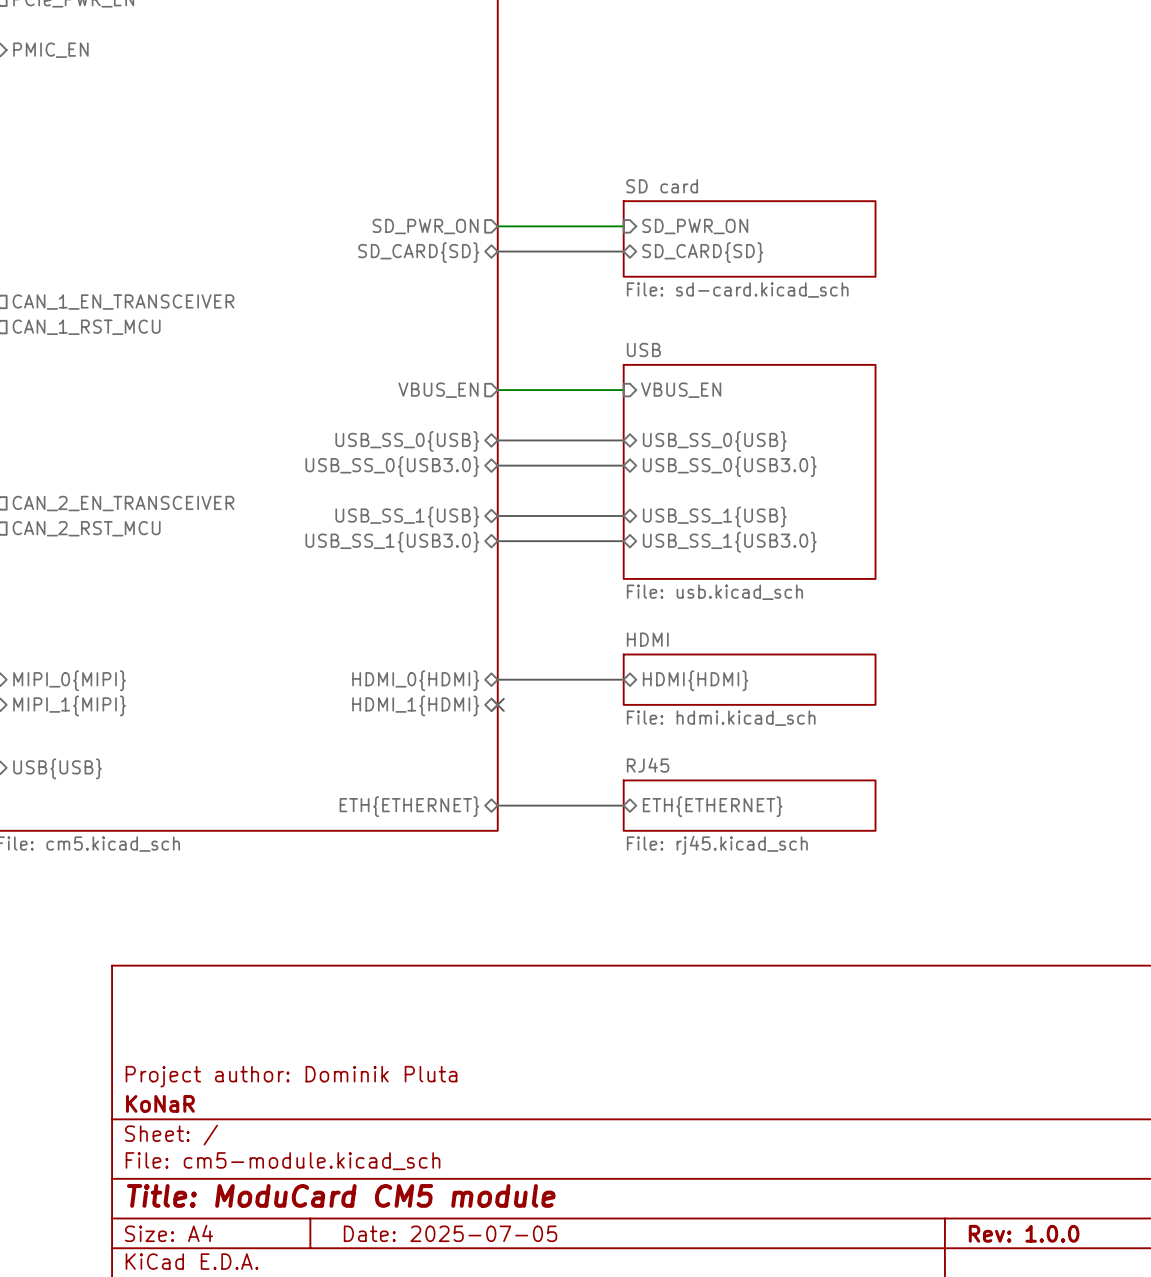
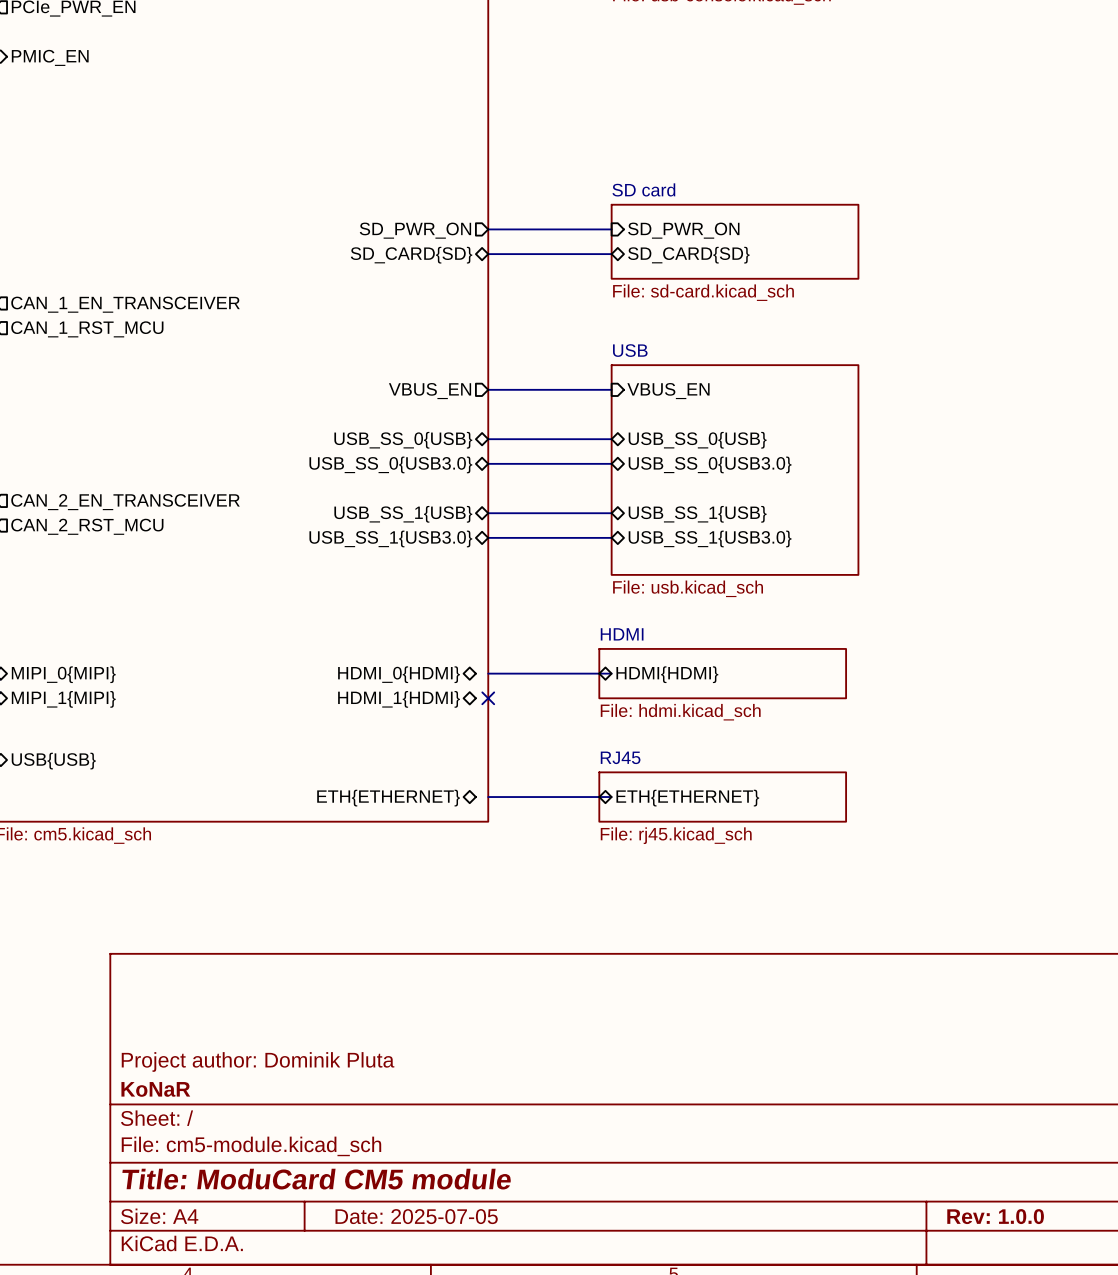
sheet HDMI position: (749, 679) -> (722, 673)
sheet pin position: HDMI_0{HDMI} (415, 680) -> HDMI_0{HDMI} (399, 674)
sheet pin position: HDMI{HDMI} (695, 680) -> HDMI{HDMI} (667, 674)
sheet pin position: HDMI_1{HDMI} (415, 705) -> HDMI_1{HDMI} (399, 699)
sheet RJ45 position: (749, 805) -> (722, 797)
sheet pin position: ETH{ETHERNET} (409, 806) -> ETH{ETHERNET} (388, 798)
sheet pin position: ETH{ETHERNET} (712, 806) -> ETH{ETHERNET} (687, 798)

